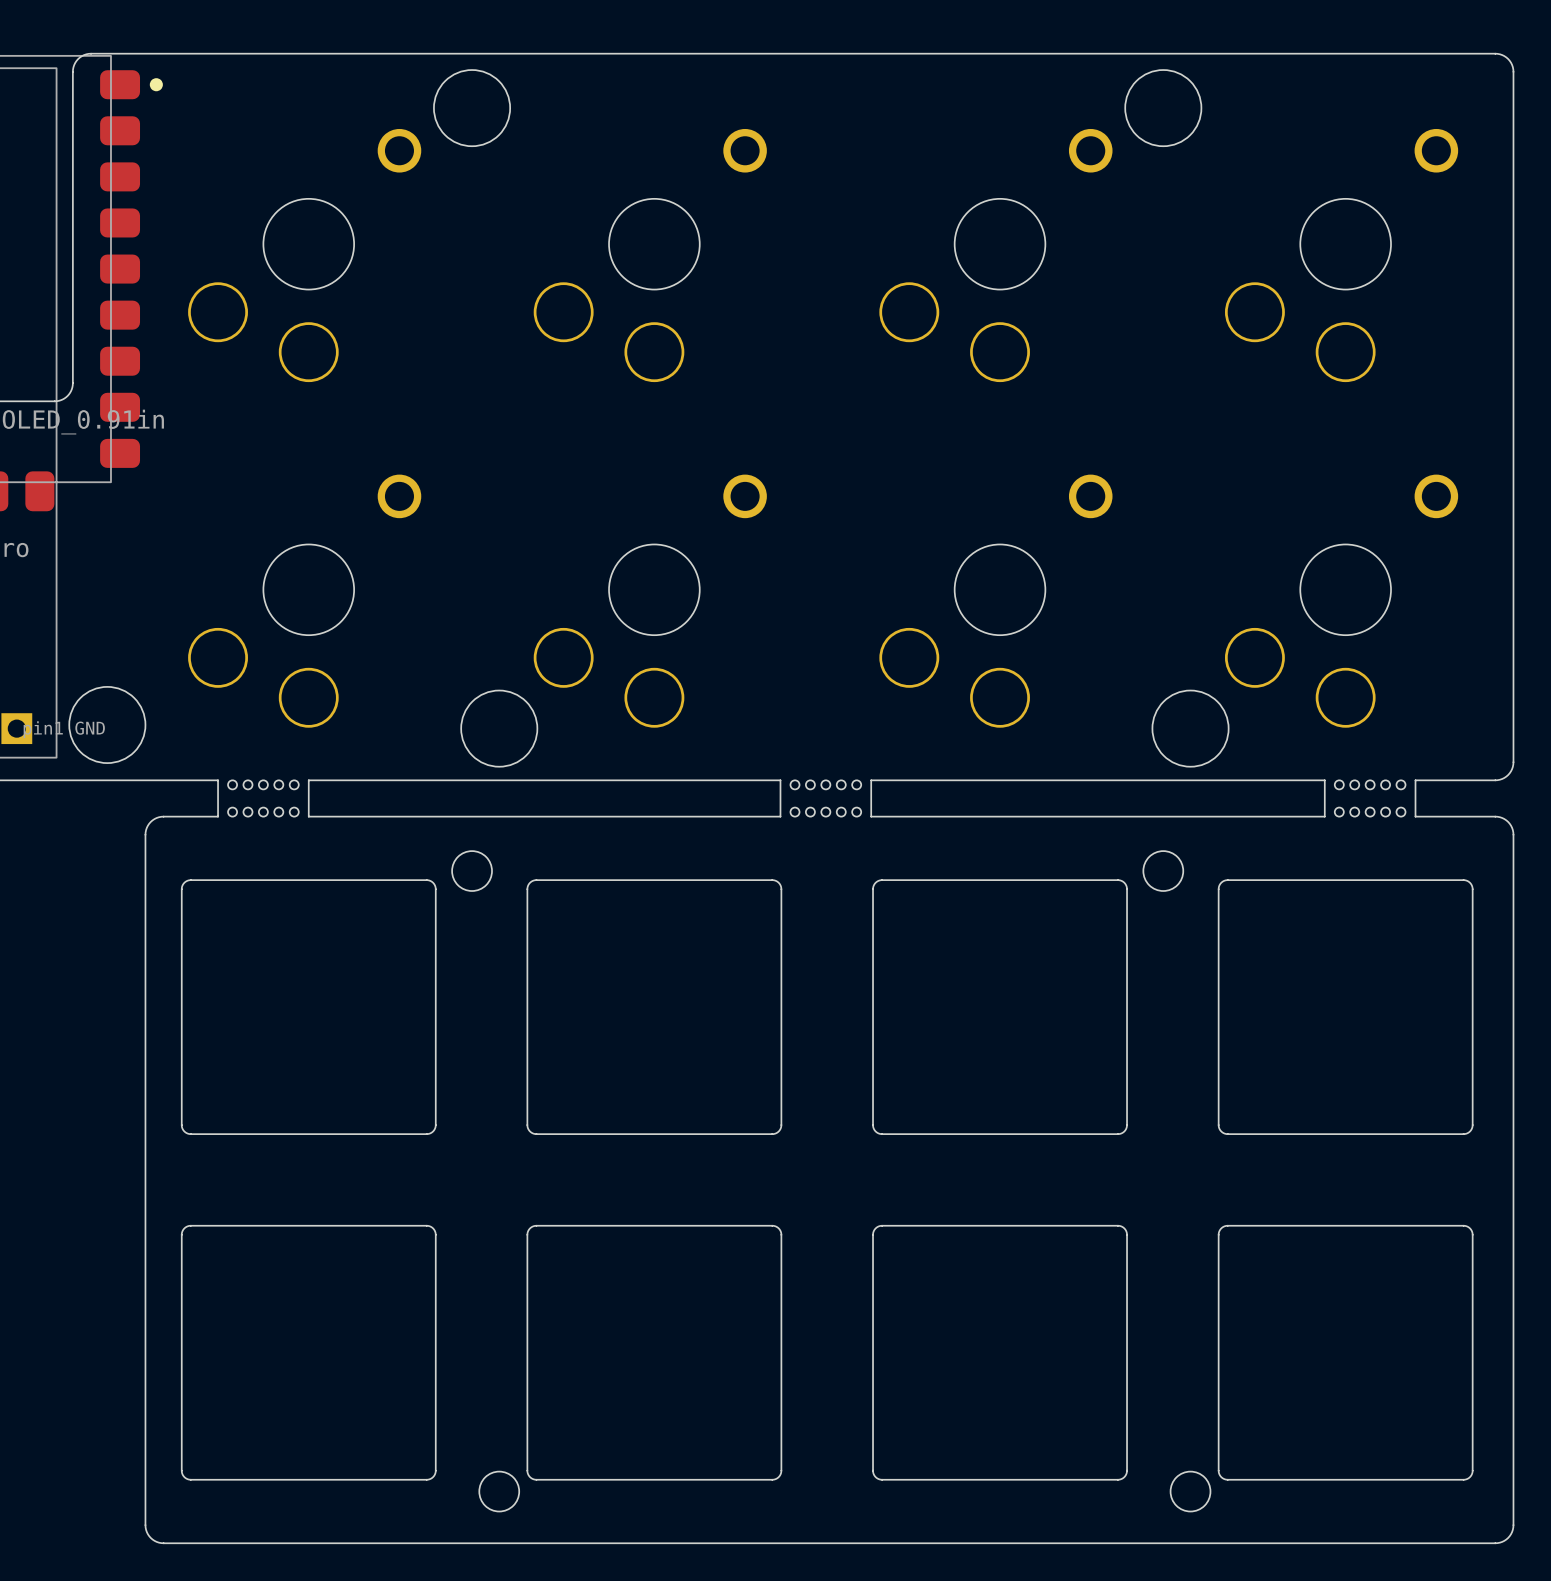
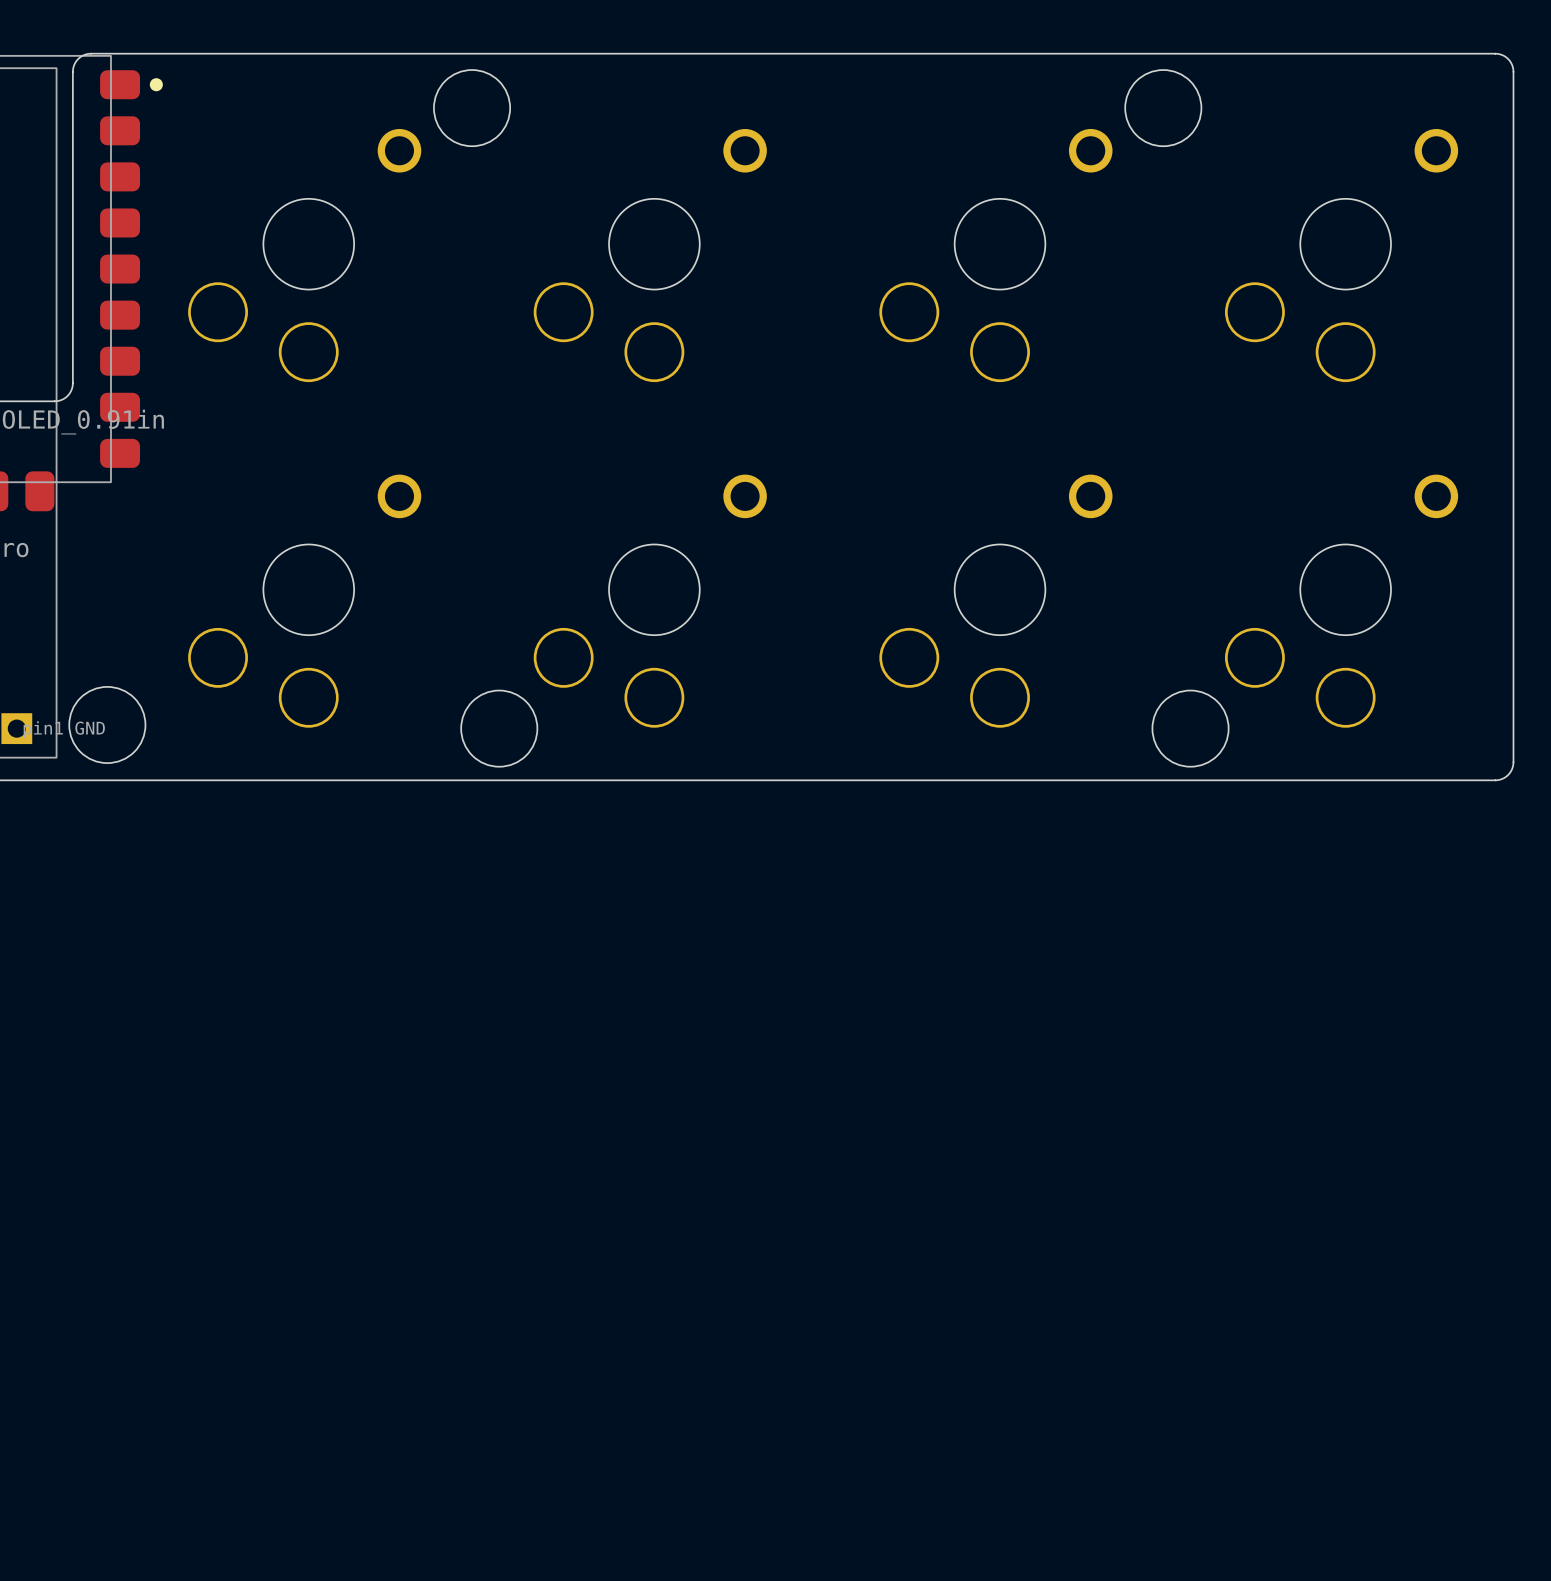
board edge: (218, 780) (218, 816) (158, 817) (149, 823) (145, 832) (145, 1525) (147, 1534) (154, 1540) (163, 1543) (1497, 1543) (1508, 1537) (1513, 1525) (1513, 832) (1508, 821) (1497, 816) (1415, 816) (1415, 780) -> (1324, 780) (1415, 780)
board edge: (308, 780) (308, 816) (780, 816) (780, 780) -> (308, 780) (218, 780)
board edge: (871, 780) (871, 816) (1324, 816) (1324, 780) -> (871, 780) (780, 780)
part: (263, 784) -> none
part: (825, 784) -> none
part: (1370, 784) -> none
part: (263, 812) -> none
part: (825, 812) -> none
part: (1370, 812) -> none
round board edge: [451, 850, 493, 892] -> none
round board edge: [1142, 850, 1184, 892] -> none
board edge: (190, 880) (426, 880) (433, 882) (435, 889) (435, 1125) (433, 1131) (426, 1134) (190, 1134) (184, 1131) (181, 1125) (181, 889) (184, 882) (190, 880) -> none
board edge: (536, 880) (772, 880) (778, 882) (781, 889) (781, 1125) (778, 1131) (772, 1134) (536, 1134) (530, 1131) (527, 1125) (527, 889) (530, 882) (536, 880) -> none
board edge: (882, 880) (1117, 880) (1124, 882) (1127, 889) (1127, 1125) (1124, 1131) (1117, 1134) (882, 1134) (875, 1131) (873, 1125) (873, 889) (875, 882) (882, 880) -> none
board edge: (1227, 880) (1463, 880) (1470, 882) (1472, 889) (1472, 1125) (1470, 1131) (1463, 1134) (1227, 1134) (1221, 1131) (1218, 1125) (1218, 889) (1221, 882) (1227, 880) -> none
board edge: (190, 1225) (426, 1225) (433, 1228) (435, 1234) (435, 1470) (433, 1477) (426, 1479) (190, 1479) (184, 1477) (181, 1470) (181, 1234) (184, 1228) (190, 1225) -> none
board edge: (536, 1225) (772, 1225) (778, 1228) (781, 1234) (781, 1470) (778, 1477) (772, 1479) (536, 1479) (530, 1477) (527, 1470) (527, 1234) (530, 1228) (536, 1225) -> none
board edge: (882, 1225) (1117, 1225) (1124, 1228) (1127, 1234) (1127, 1470) (1124, 1477) (1117, 1479) (882, 1479) (875, 1477) (873, 1470) (873, 1234) (875, 1228) (882, 1225) -> none
board edge: (1227, 1225) (1463, 1225) (1470, 1228) (1472, 1234) (1472, 1470) (1470, 1477) (1463, 1479) (1227, 1479) (1221, 1477) (1218, 1470) (1218, 1234) (1221, 1228) (1227, 1225) -> none
round board edge: [478, 1471, 520, 1512] -> none
round board edge: [1170, 1471, 1211, 1512] -> none

